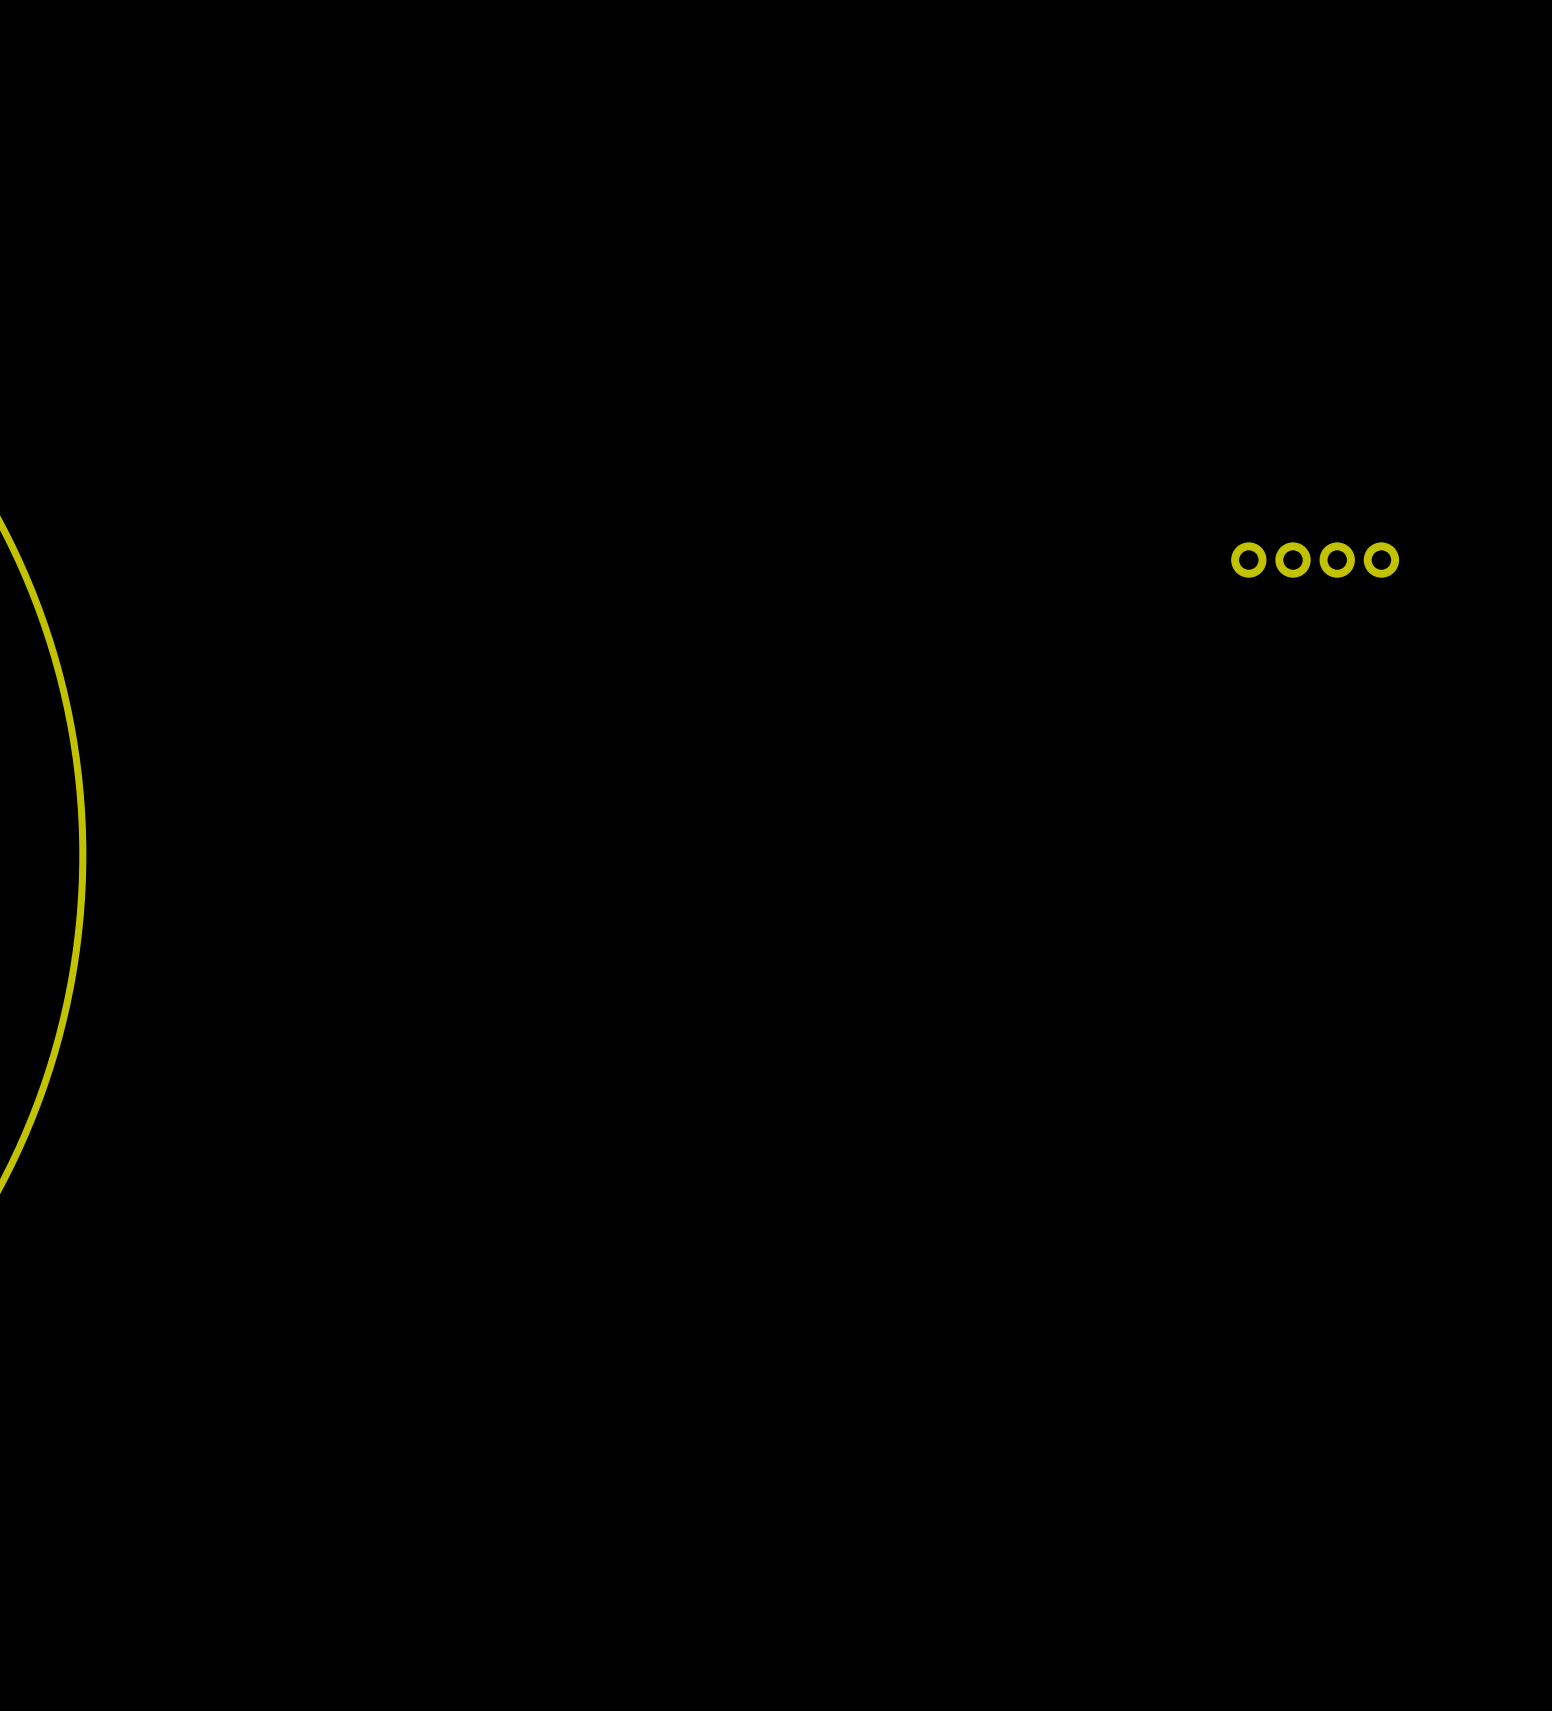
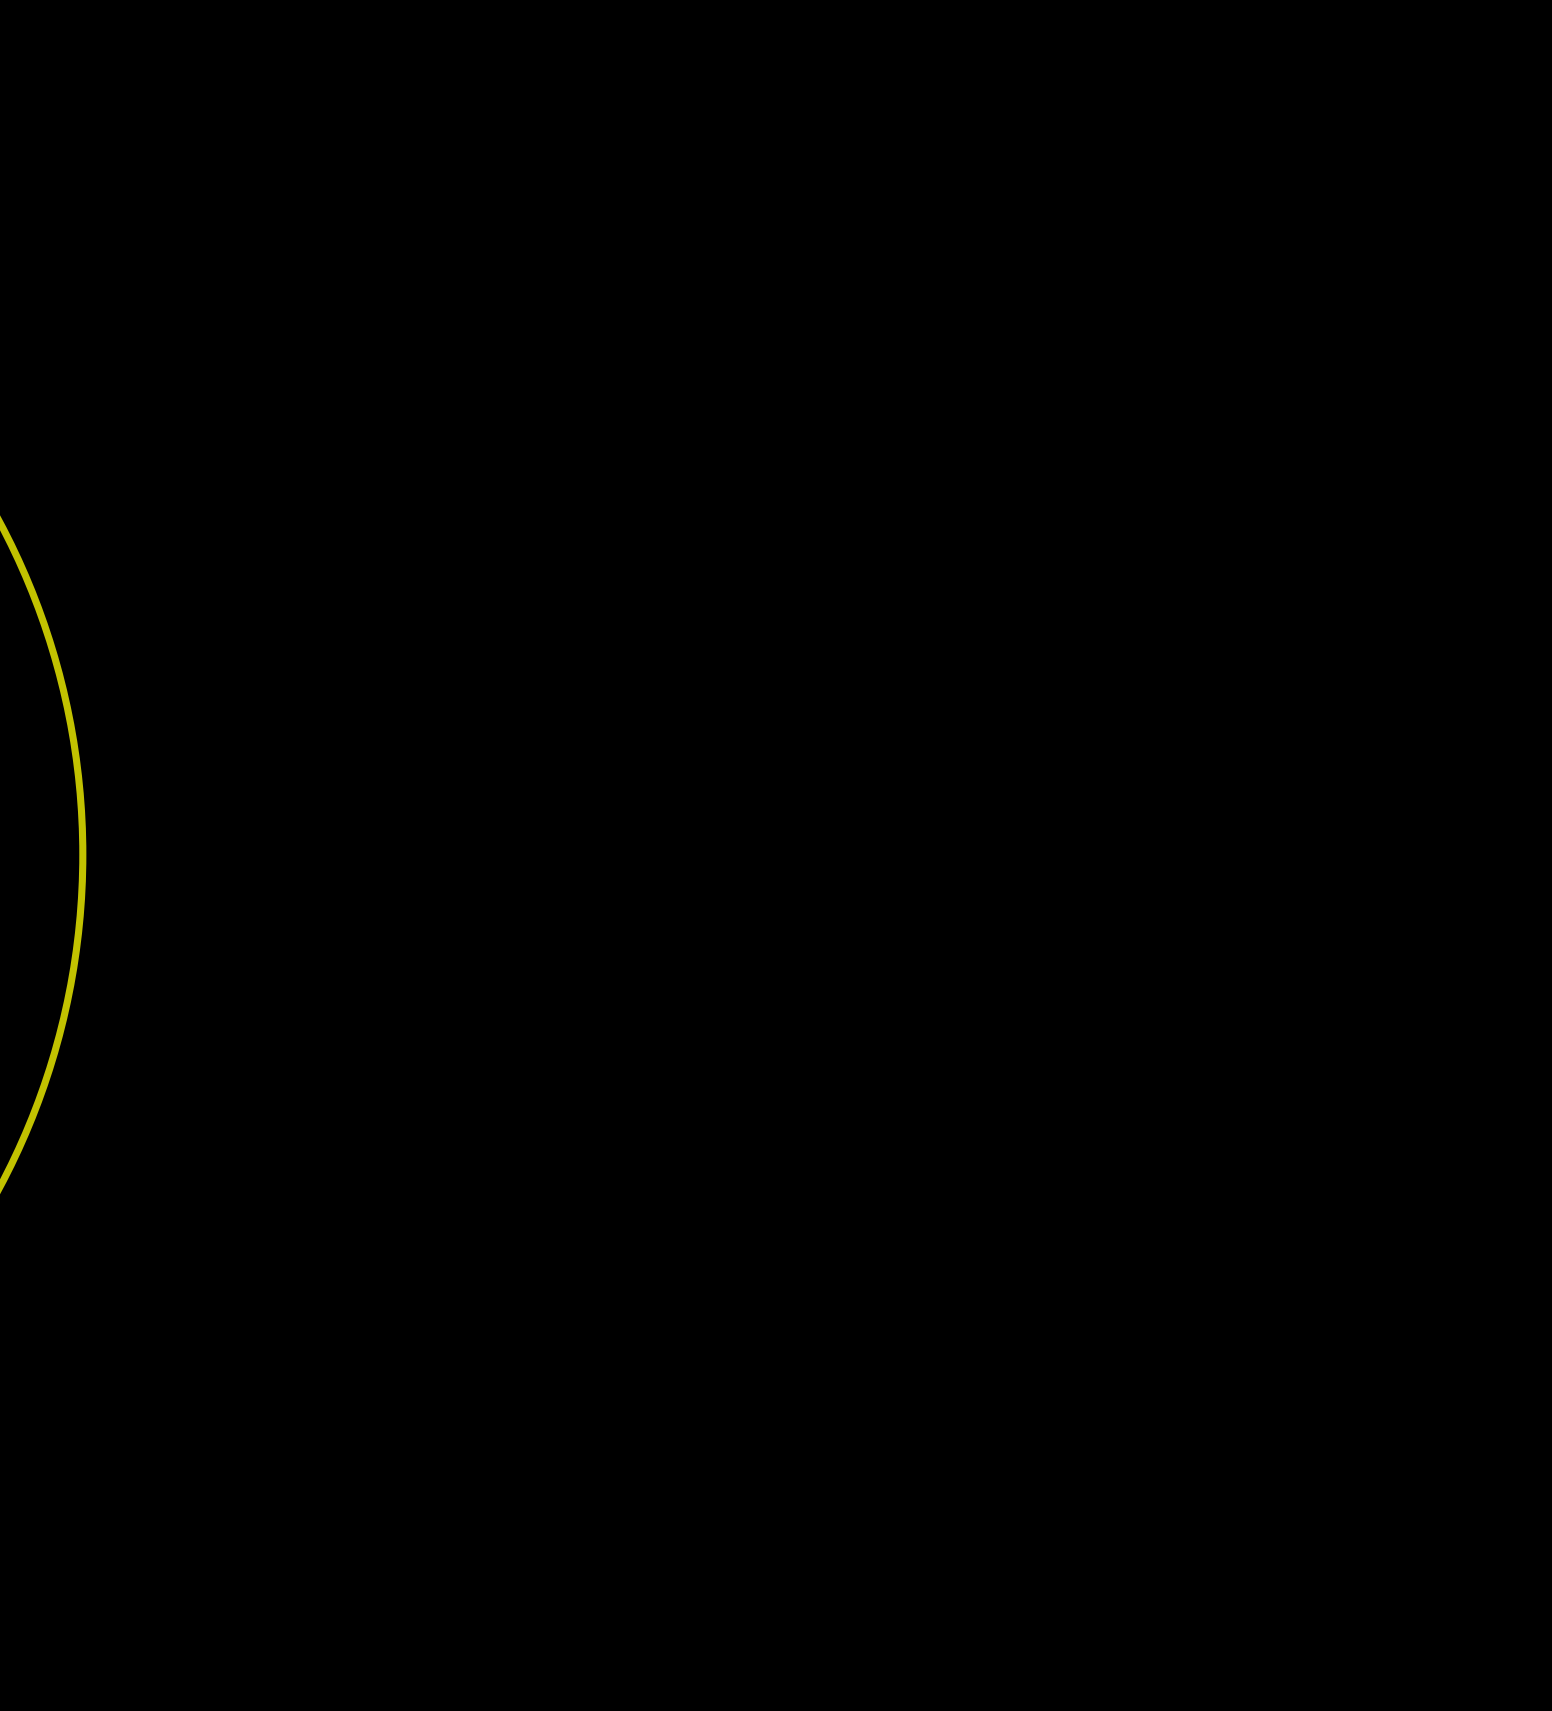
part: (1315, 560) -> none

